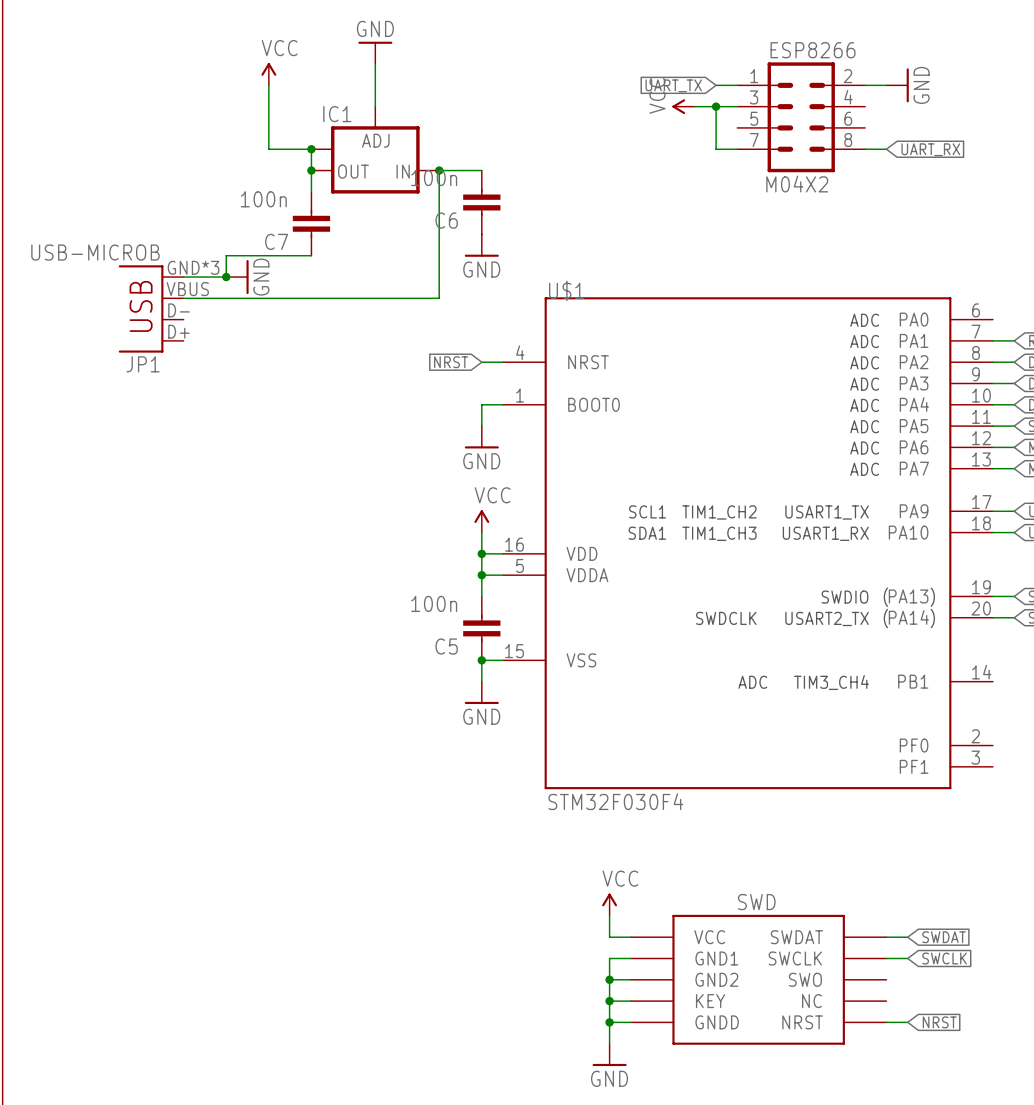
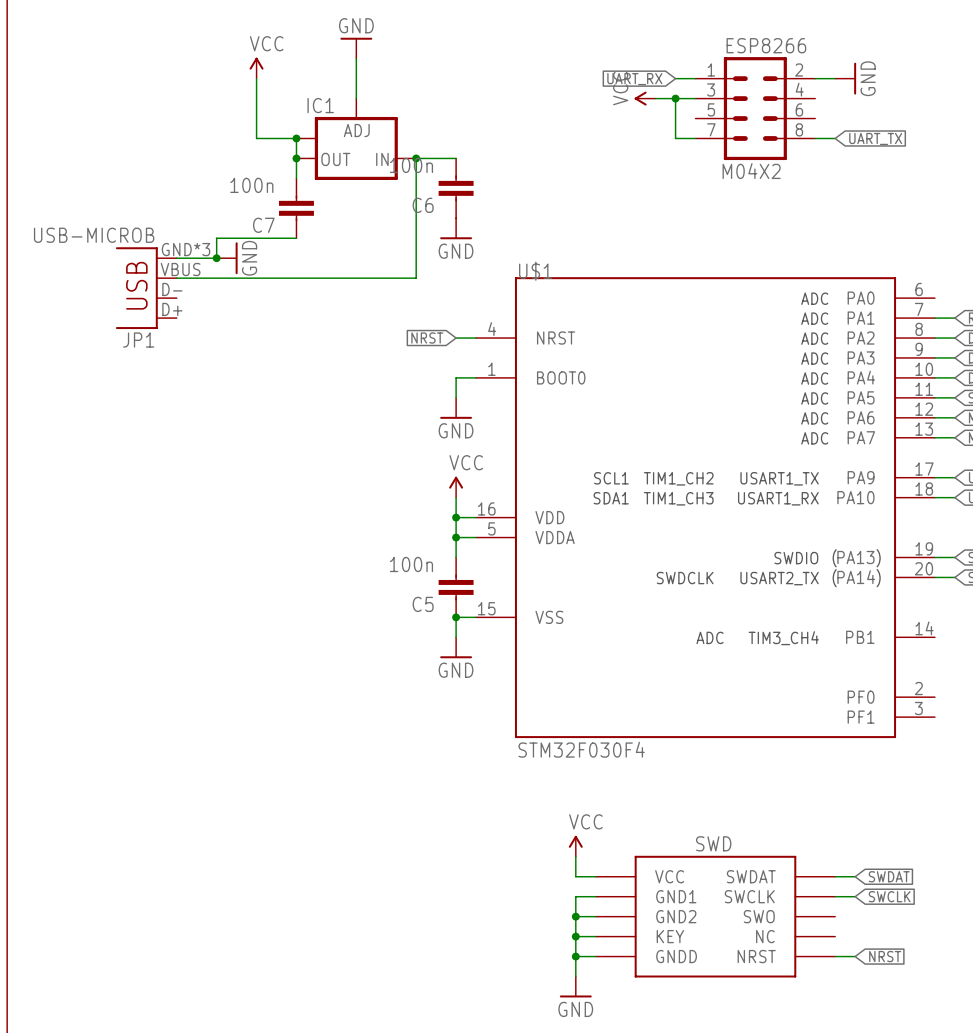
global label: UART_TX (673, 85) -> UART_RX (634, 79)
global label: UART_RX (930, 149) -> UART_TX (875, 138)

